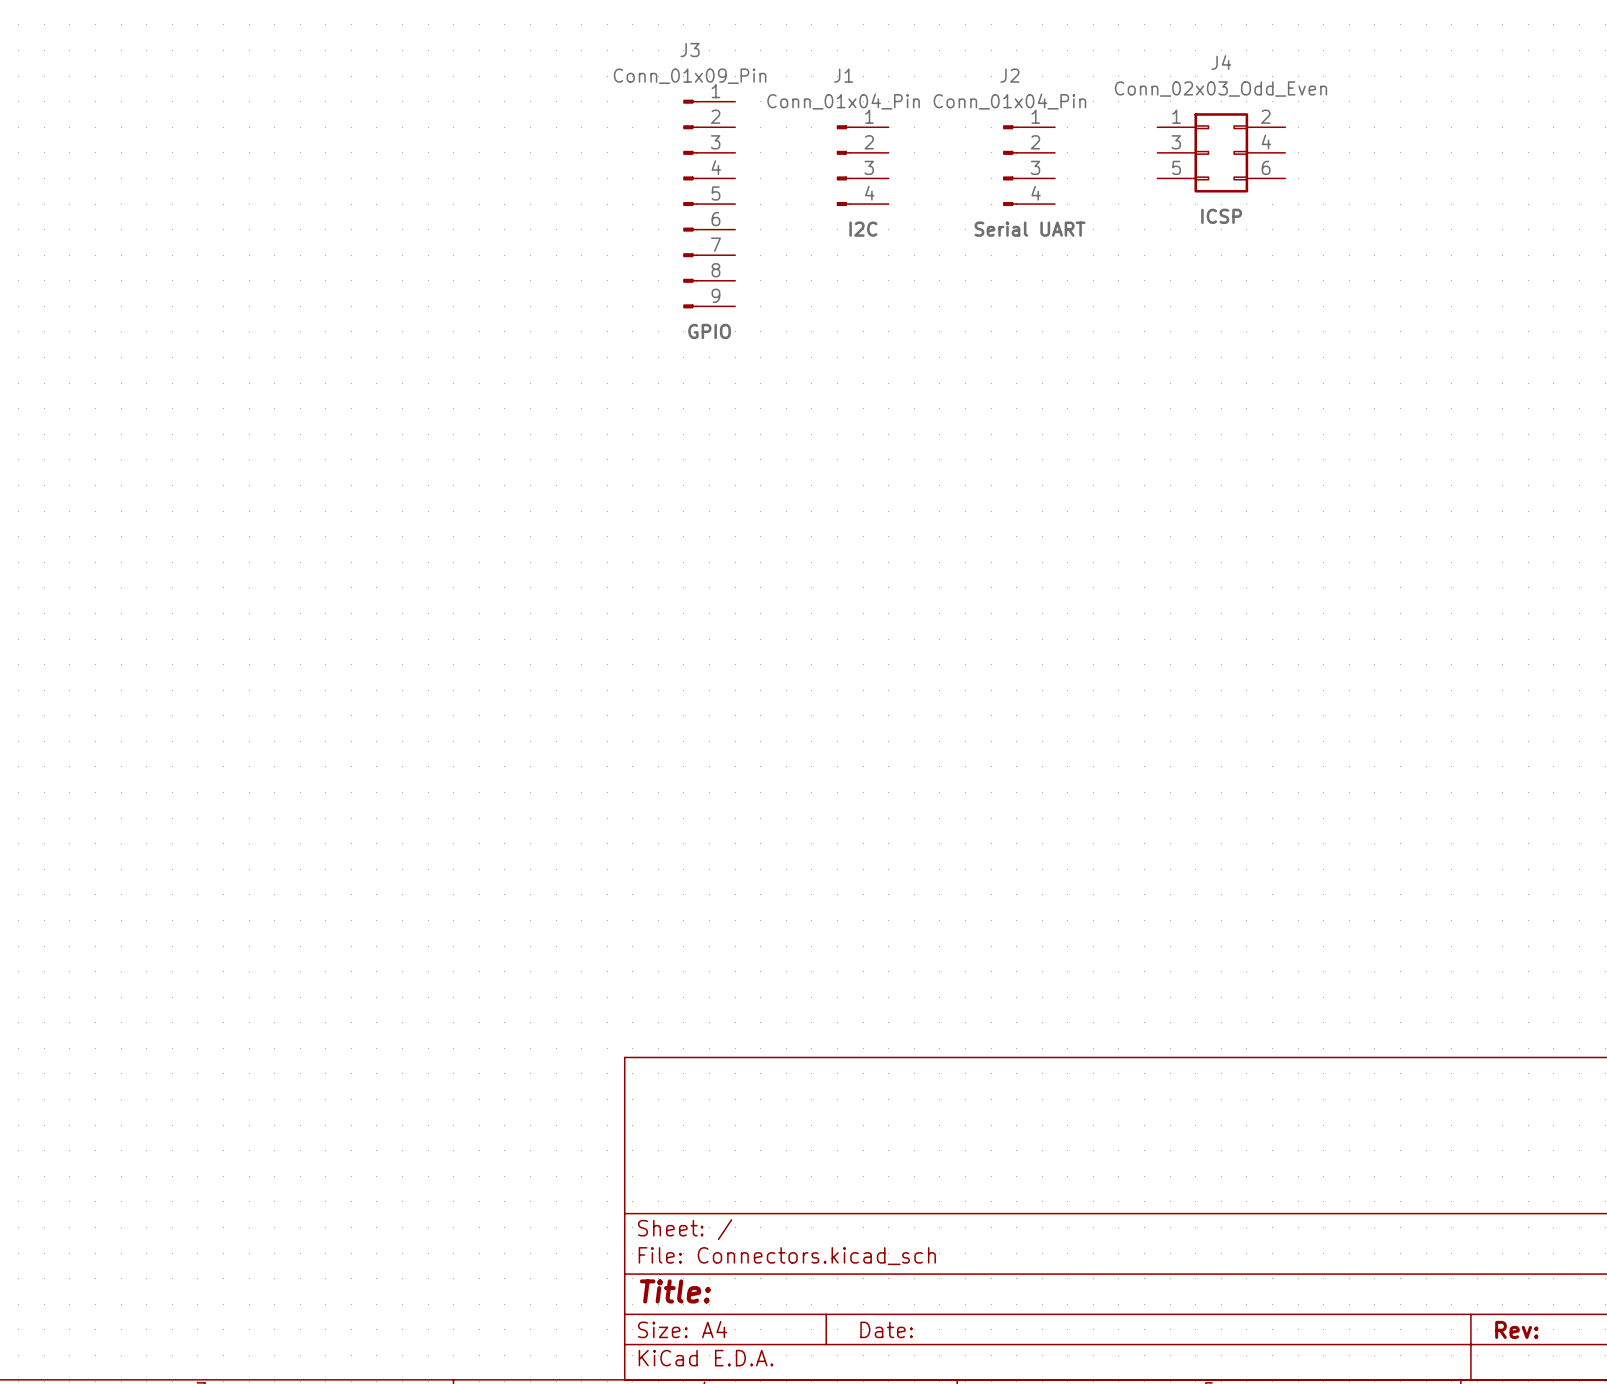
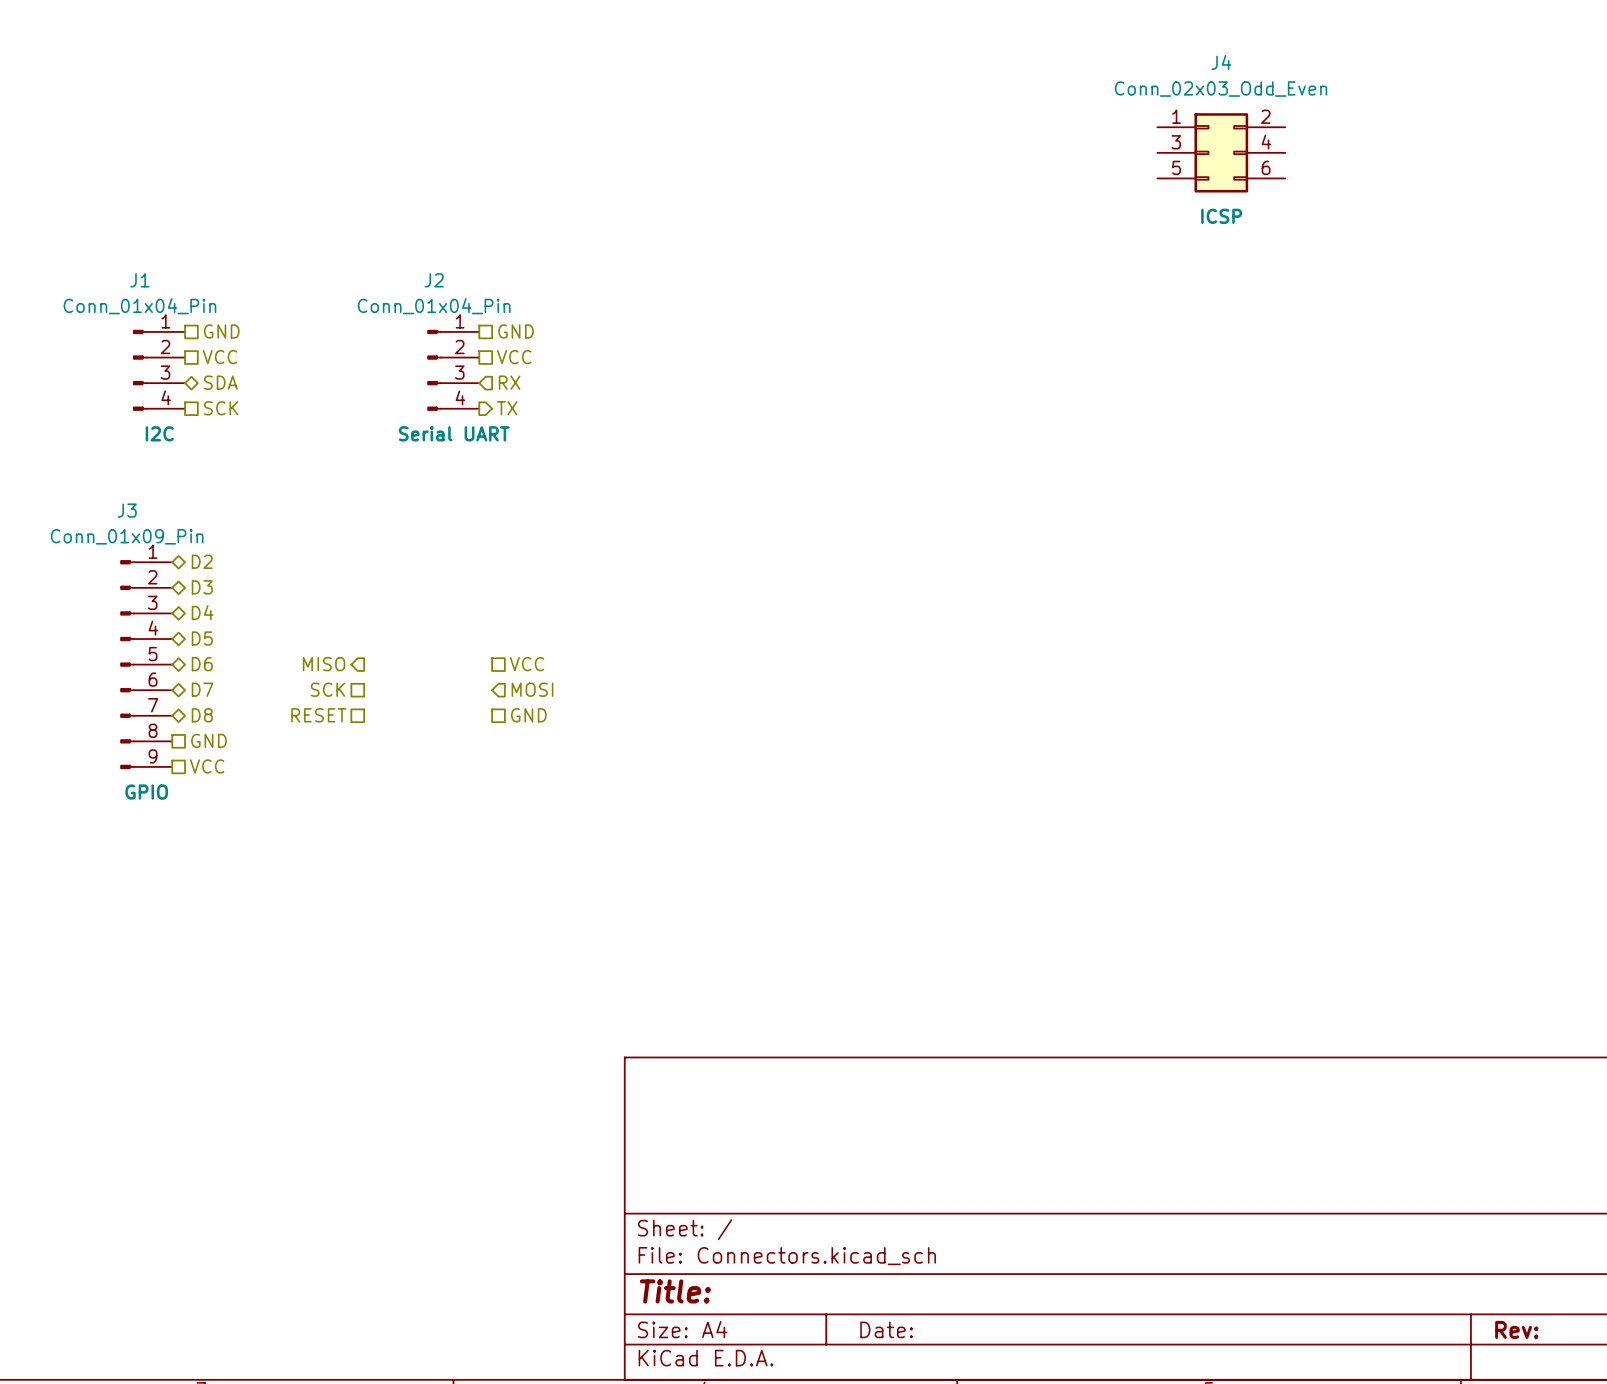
J1 position: (862, 165) -> (159, 370)
J2 position: (1029, 165) -> (453, 370)
J3 position: (709, 204) -> (146, 664)
hierarchical label: none -> GND (221, 331)
hierarchical label: none -> GND (516, 331)
hierarchical label: none -> VCC (219, 357)
hierarchical label: none -> VCC (514, 357)
hierarchical label: none -> SDA (220, 382)
hierarchical label: none -> RX (509, 382)
hierarchical label: none -> SCK (221, 408)
hierarchical label: none -> TX (507, 408)
hierarchical label: none -> D2 (202, 561)
hierarchical label: none -> D3 (202, 587)
hierarchical label: none -> D4 (202, 612)
hierarchical label: none -> D5 (202, 638)
hierarchical label: none -> D6 (202, 664)
hierarchical label: none -> MISO (324, 664)
hierarchical label: none -> VCC (527, 664)
hierarchical label: none -> D7 (202, 689)
hierarchical label: none -> SCK (327, 689)
hierarchical label: none -> MOSI (532, 689)
hierarchical label: none -> D8 (202, 715)
hierarchical label: none -> RESET (318, 715)
hierarchical label: none -> GND (528, 715)
hierarchical label: none -> GND (208, 740)
hierarchical label: none -> VCC (207, 766)

